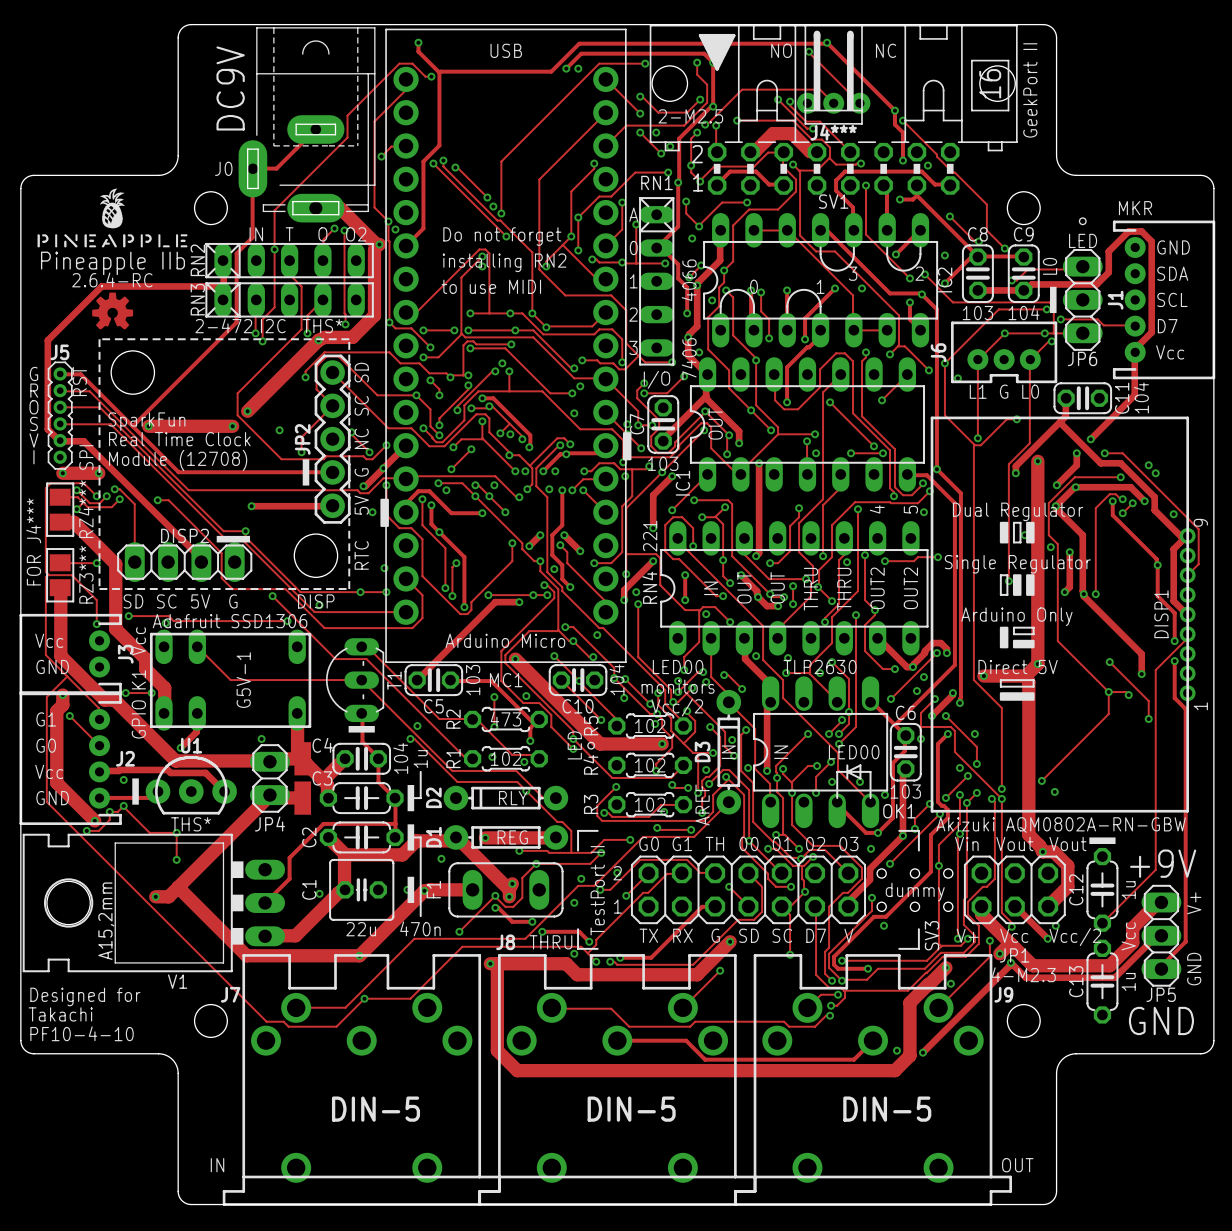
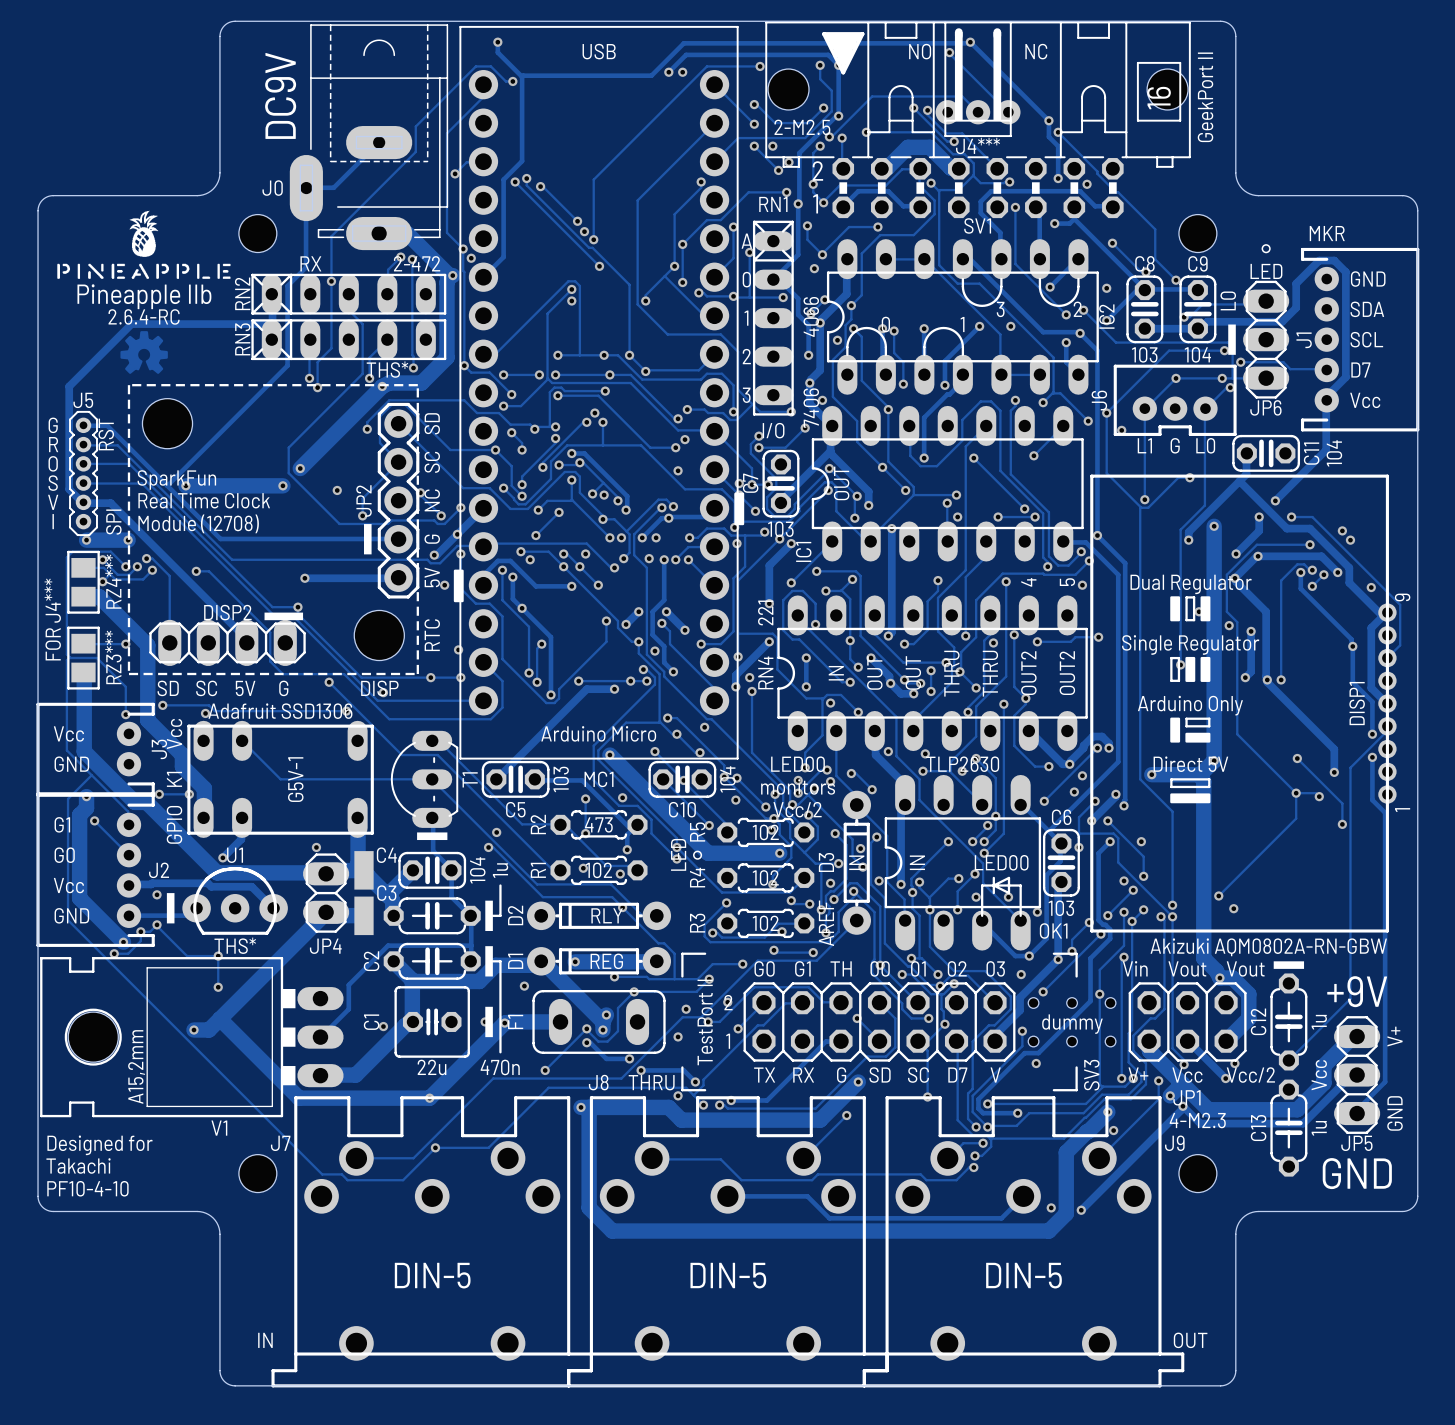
text: IN (256, 234) -> RX (310, 263)
text: T (289, 234) -> none
text: O (322, 234) -> none
text: O2 (356, 234) -> none
text: Do not forget (502, 236) -> none
text: installing RN2 (504, 262) -> none
text: to use MIDI (491, 286) -> none
text position: 2-472 (223, 325) -> 2-472 (417, 263)
text: I2C (273, 326) -> none

